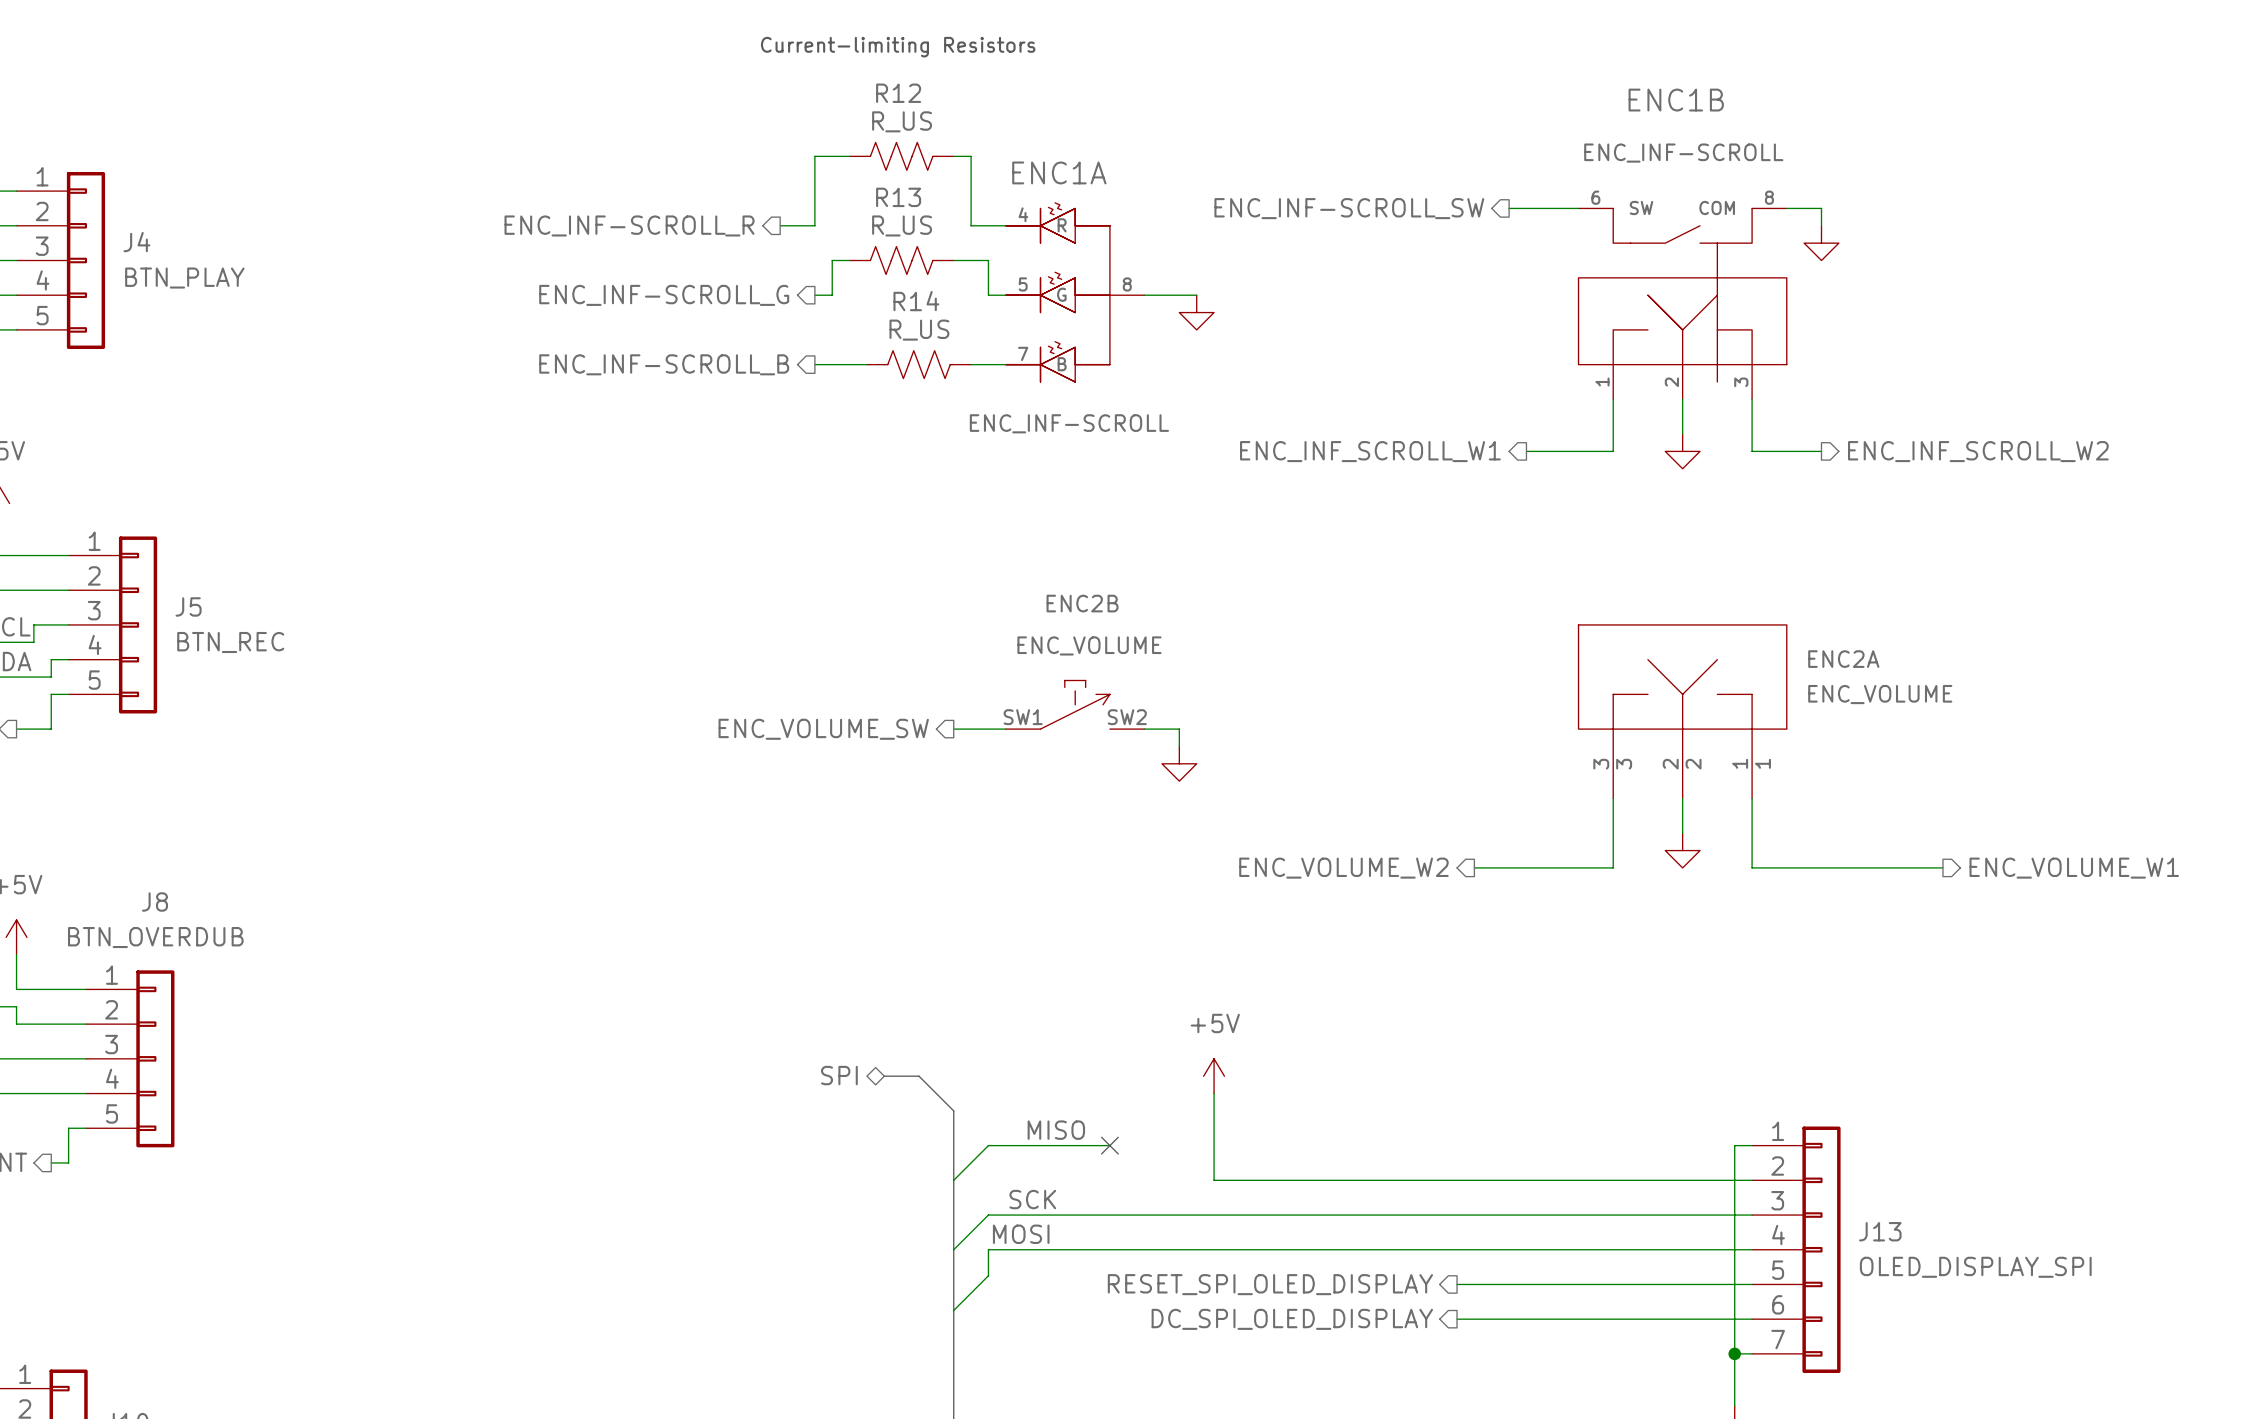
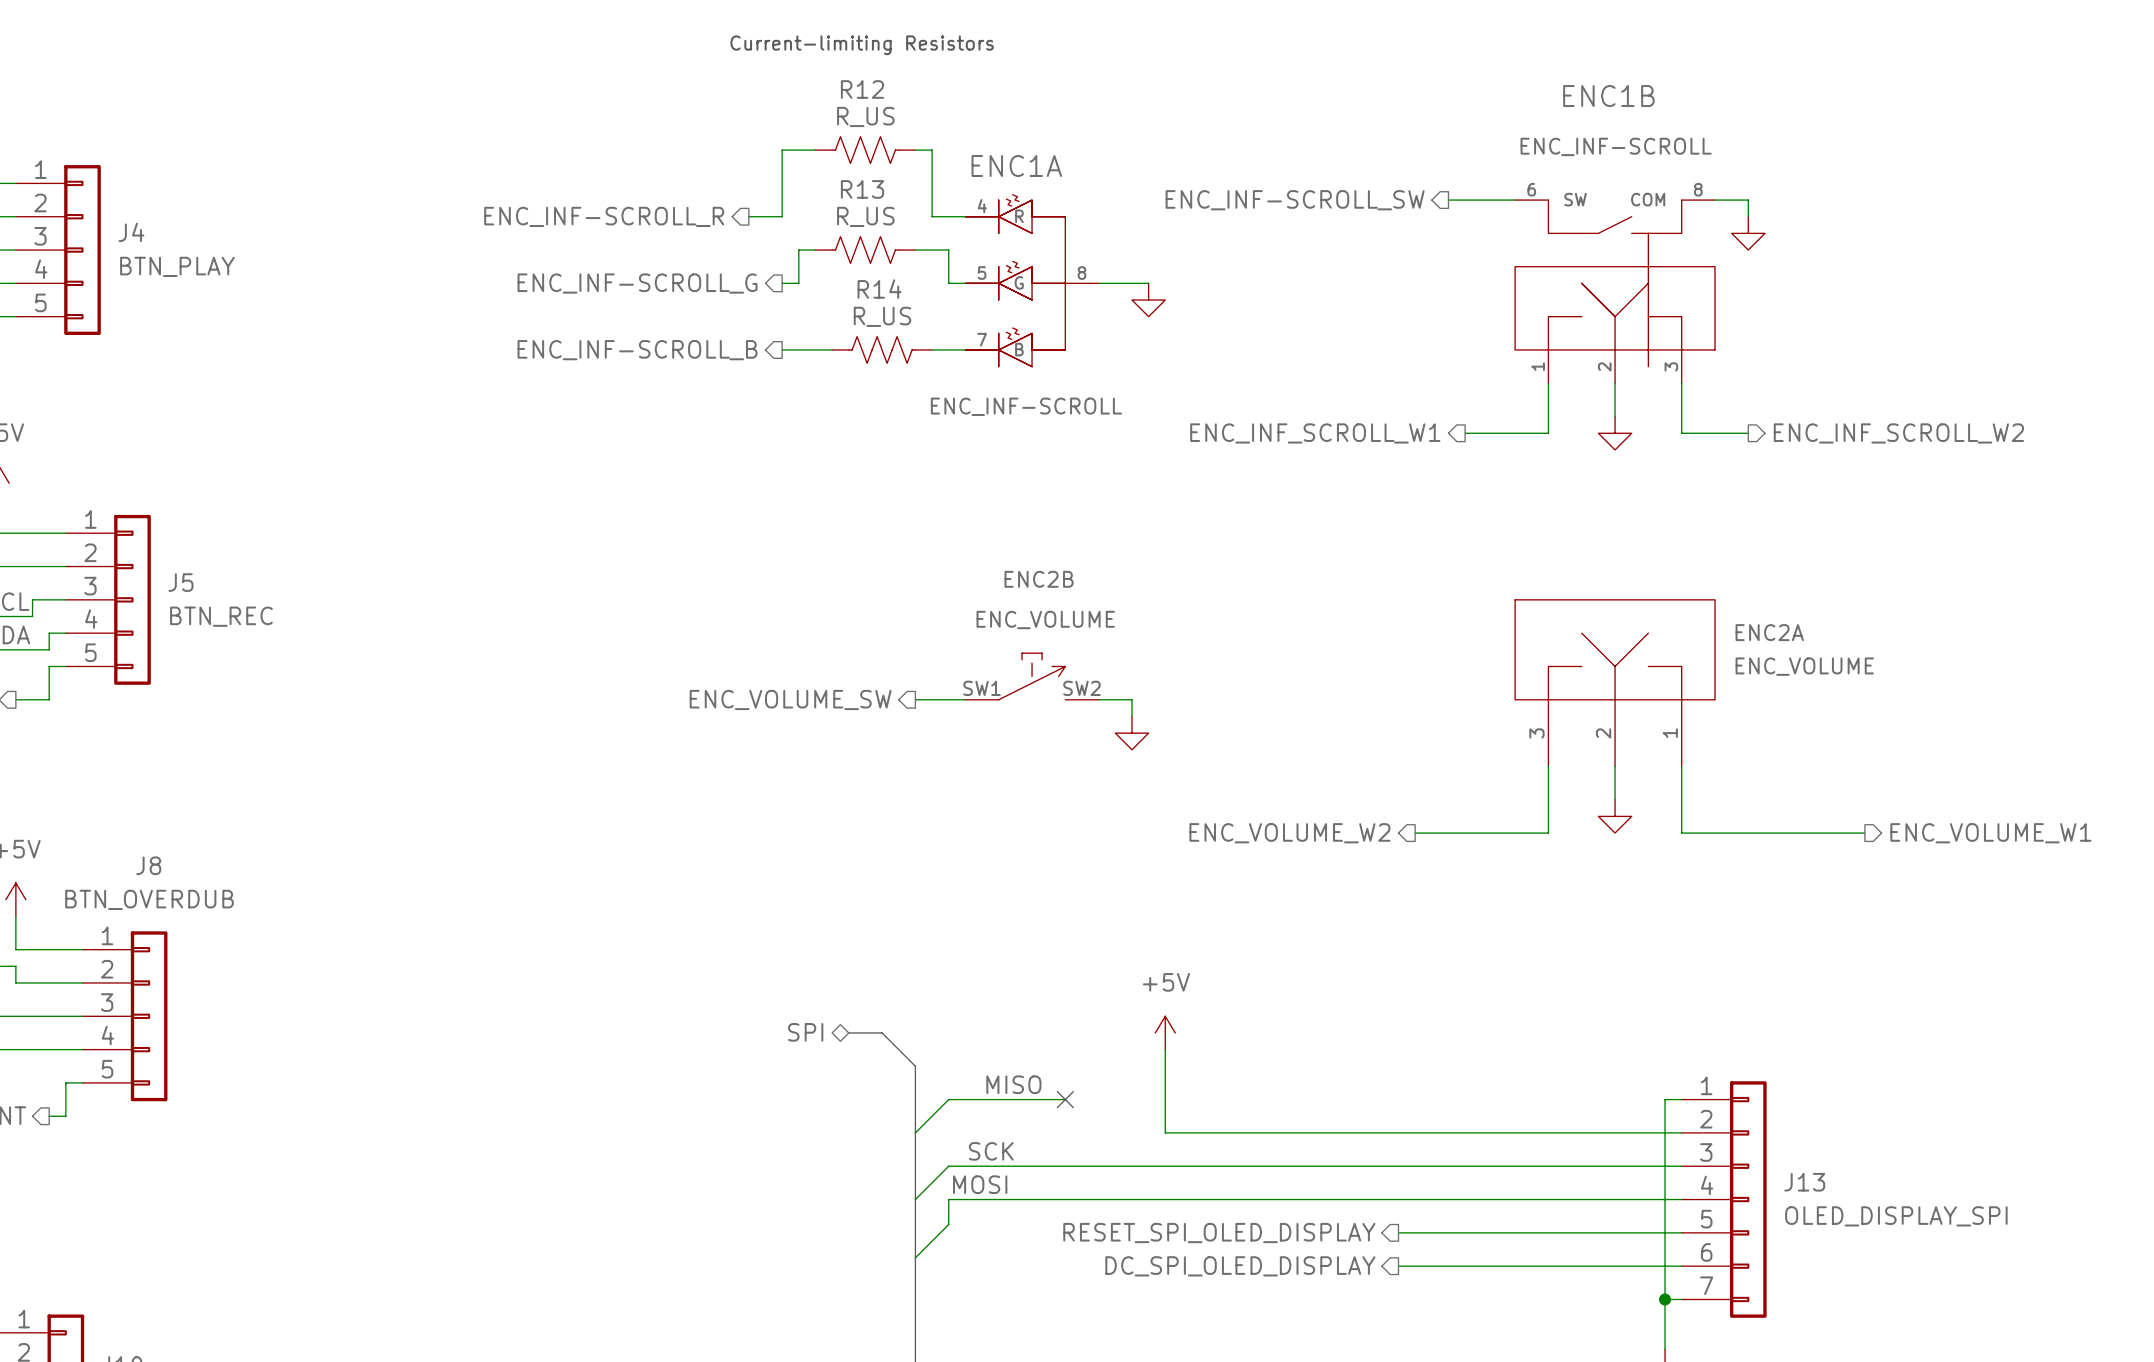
ENC2A pin number: 1 (1762, 763) -> none
ENC2A pin number: 3 (1624, 764) -> none
ENC2A pin number: 2 (1693, 764) -> none

